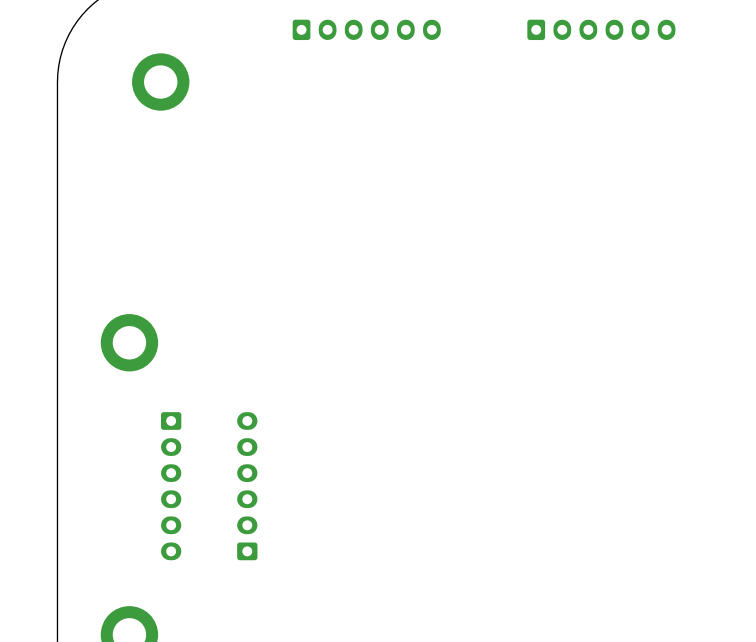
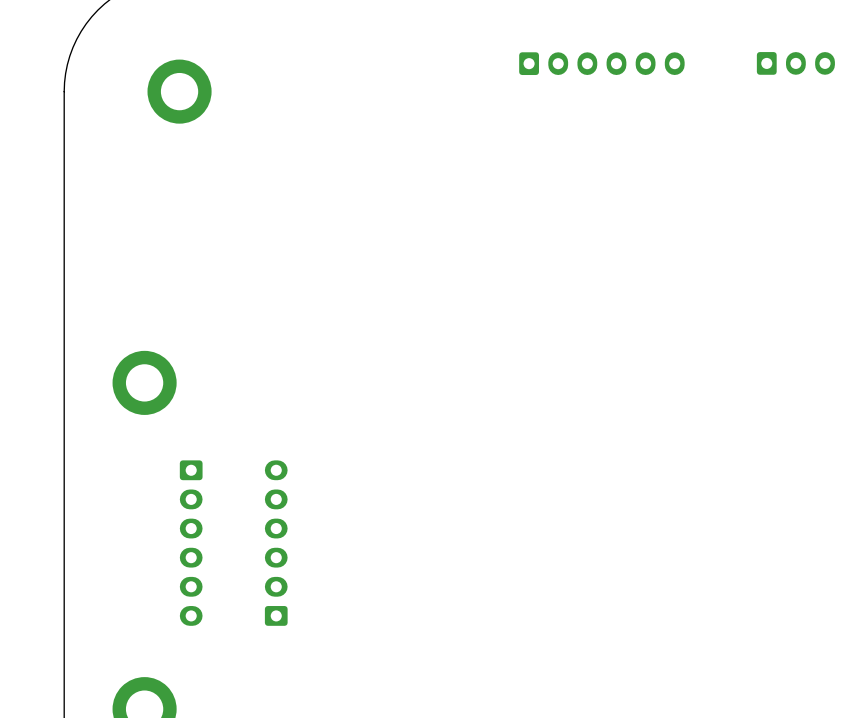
part: (366, 29) -> none
part position: (601, 29) -> (601, 63)
part: none -> (795, 63)

